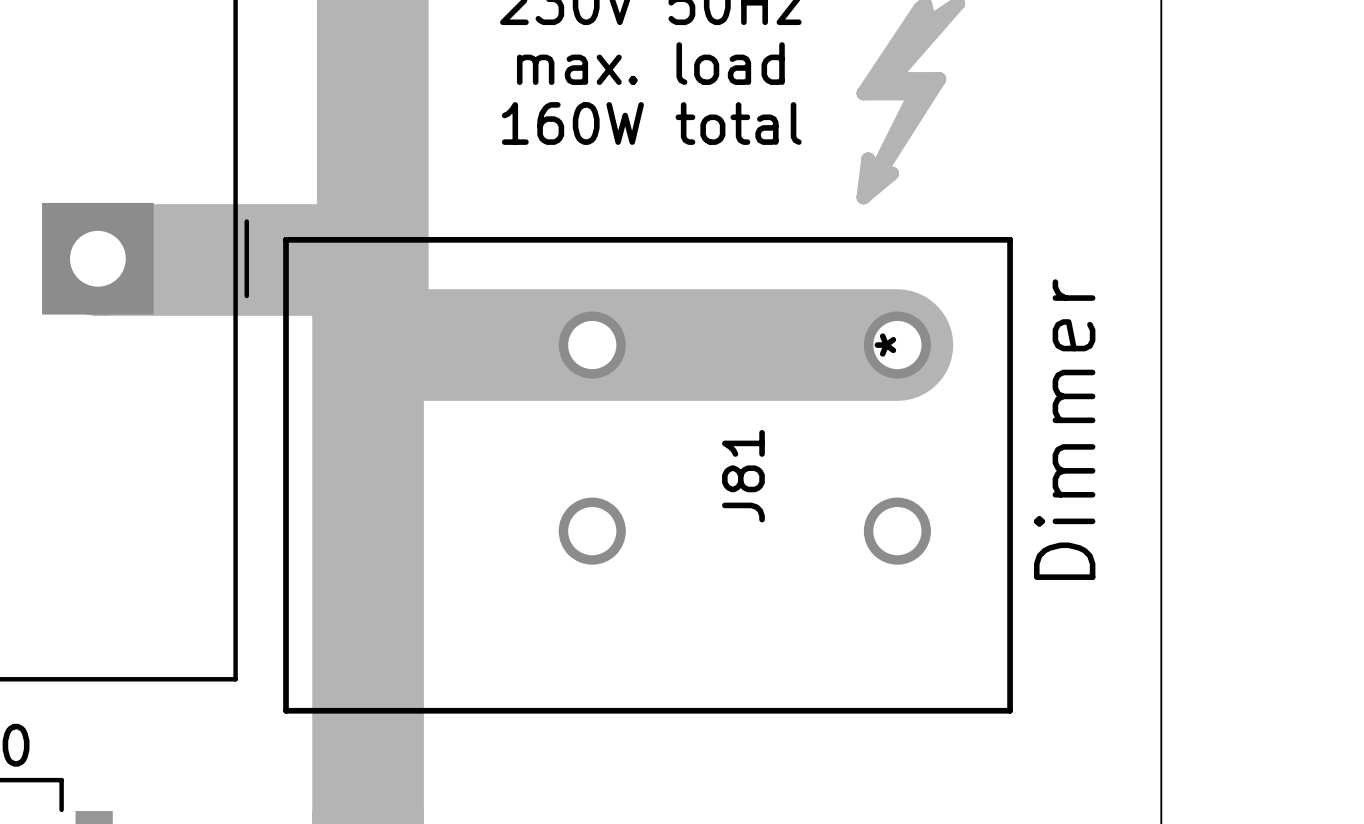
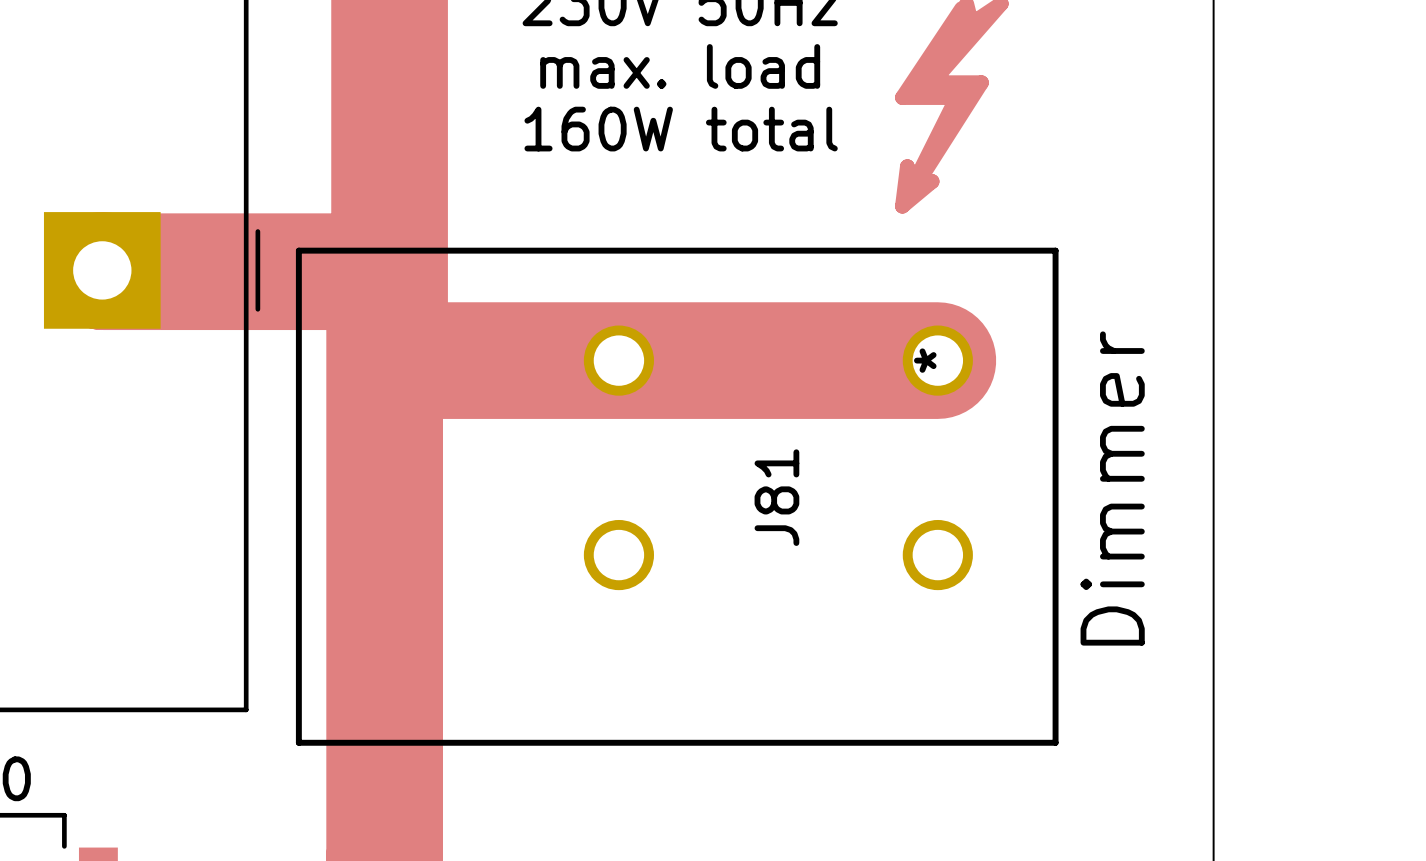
J81 value position: Dimmer (1064, 429) -> Dimmer (1112, 488)

